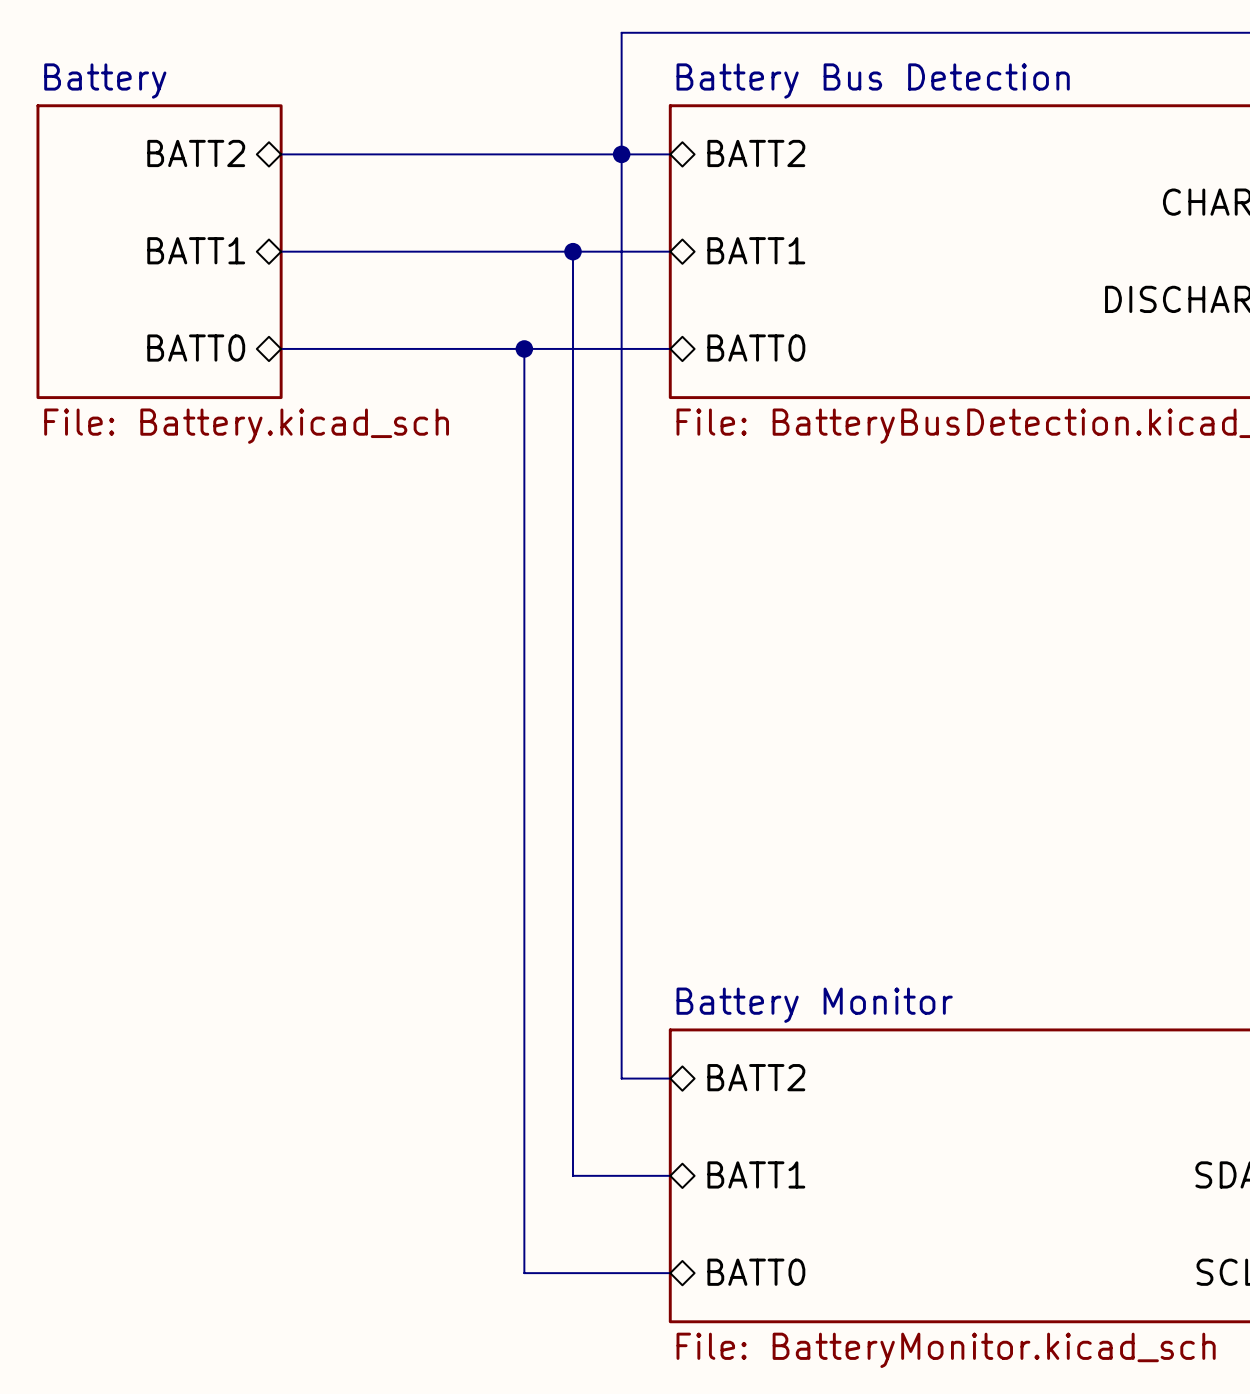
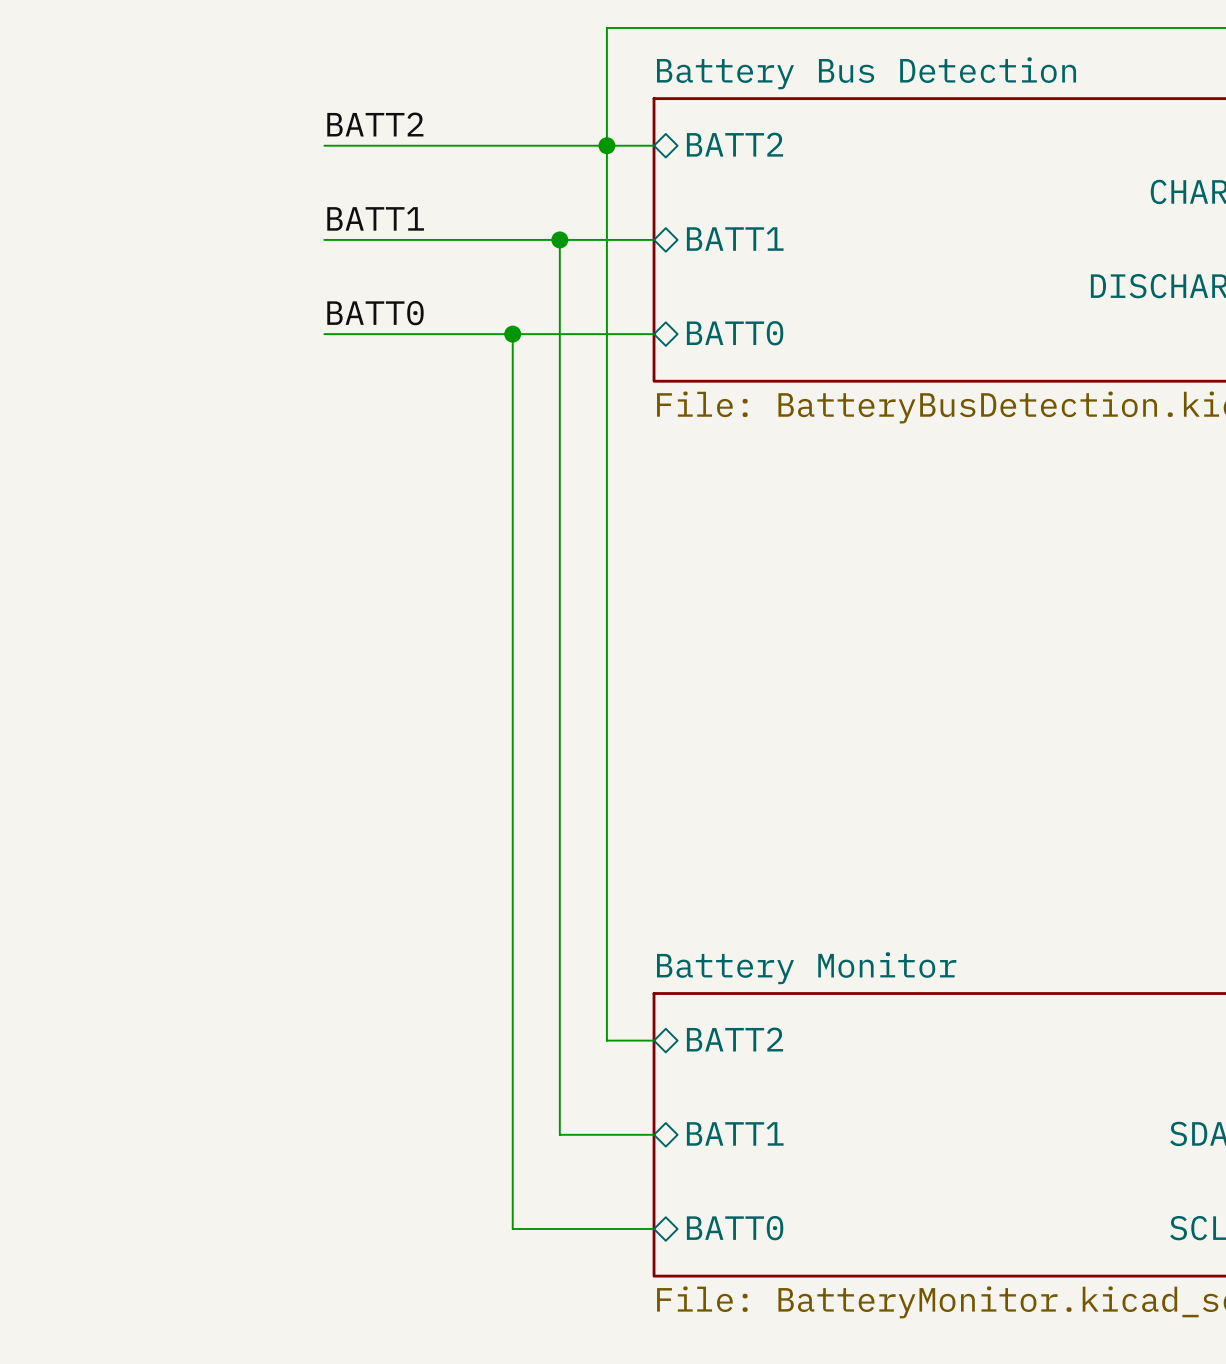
label: none -> BATT2 (375, 124)
sheet pin: BATT2 (196, 153) -> none
wire: (281, 154) (329, 154) -> none
label: none -> BATT1 (375, 218)
sheet pin: BATT1 (196, 250) -> none
sheet Battery: File: Battery.kicad_sch (159, 251) -> none
wire: (281, 251) (329, 251) -> none
label: none -> BATT0 (375, 313)
sheet pin: BATT0 (196, 348) -> none
wire: (281, 348) (329, 348) -> none

